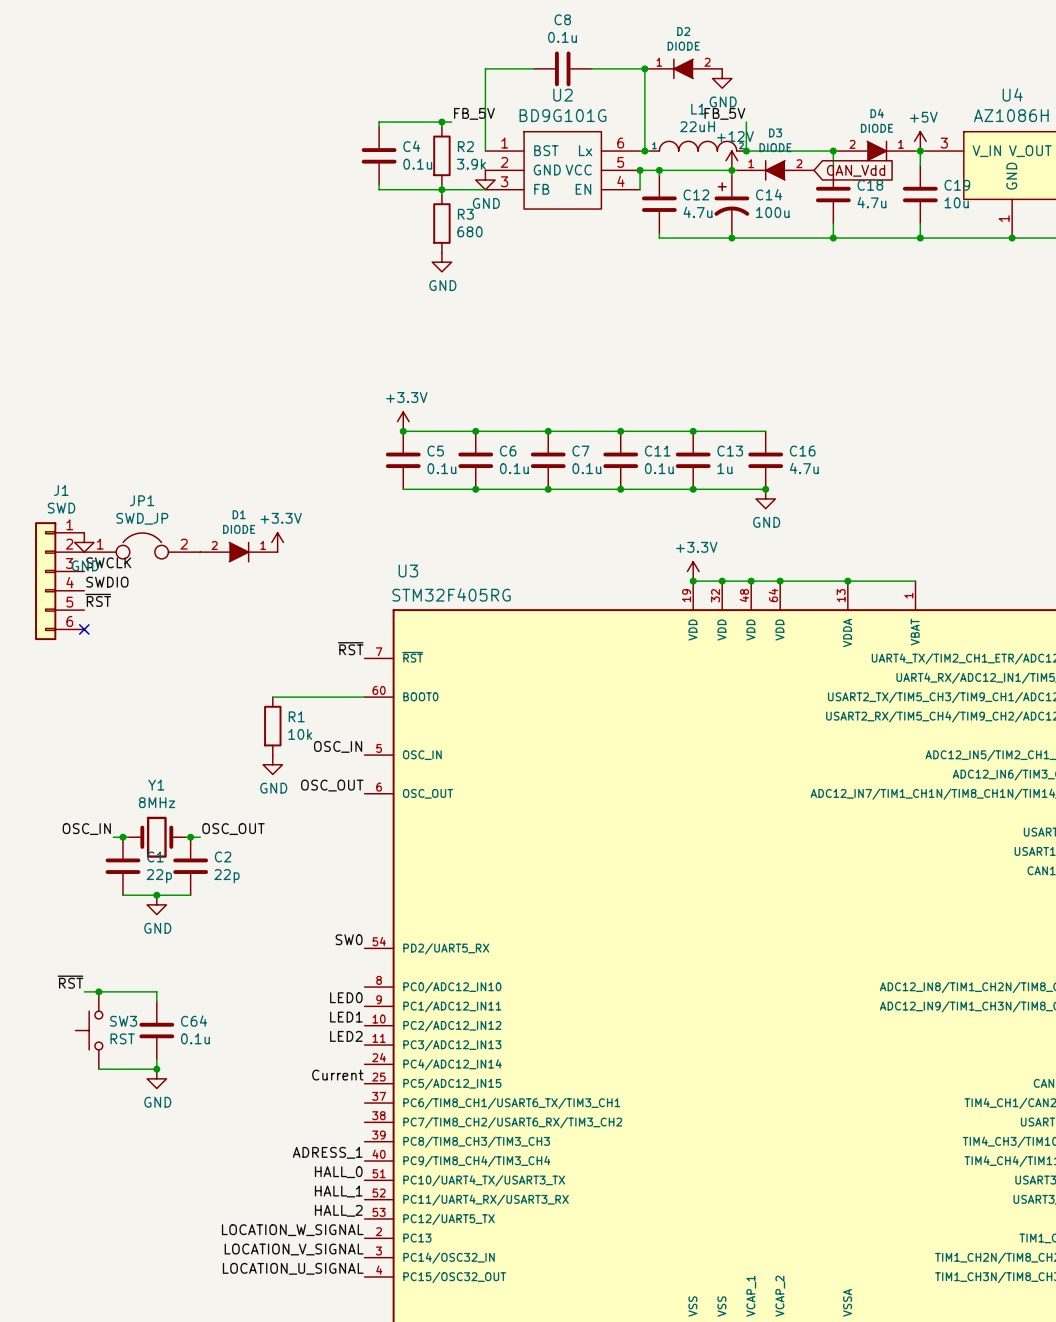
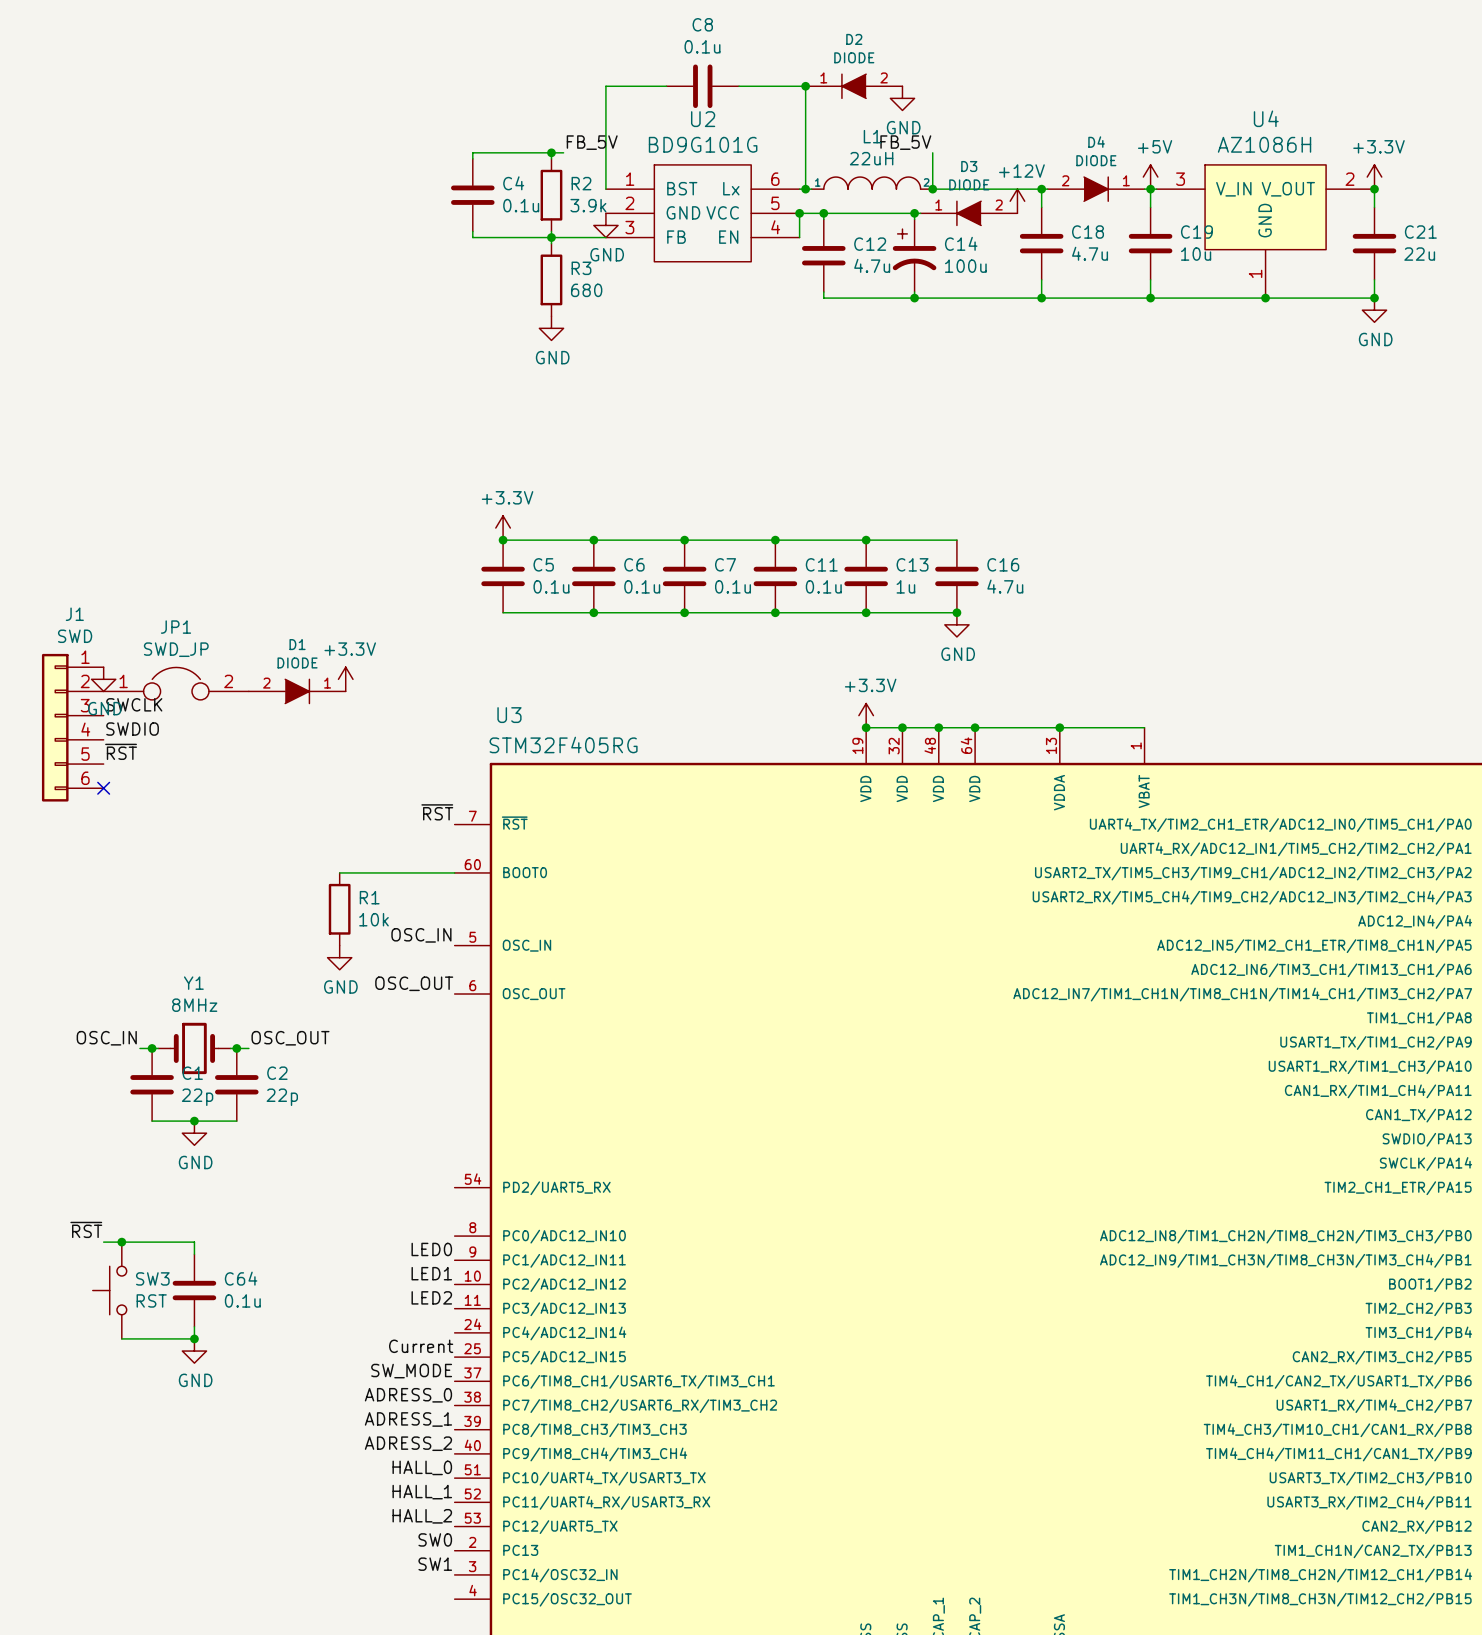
power symbol position: +12V (731, 160) -> +12V (1017, 201)
global label: CAN_Vdd (856, 170) -> none
label: SW0 (349, 939) -> none
label: none -> SW_MODE (411, 1371)
label: none -> ADRESS_0 (408, 1395)
label: none -> ADRESS_1 (408, 1419)
label: ADRESS_1 (327, 1152) -> ADRESS_2 (408, 1443)
label: LOCATION_W_SIGNAL (292, 1230) -> SW0 (435, 1539)
label: LOCATION_V_SIGNAL (294, 1249) -> SW1 (435, 1564)
label: LOCATION_U_SIGNAL (293, 1268) -> none

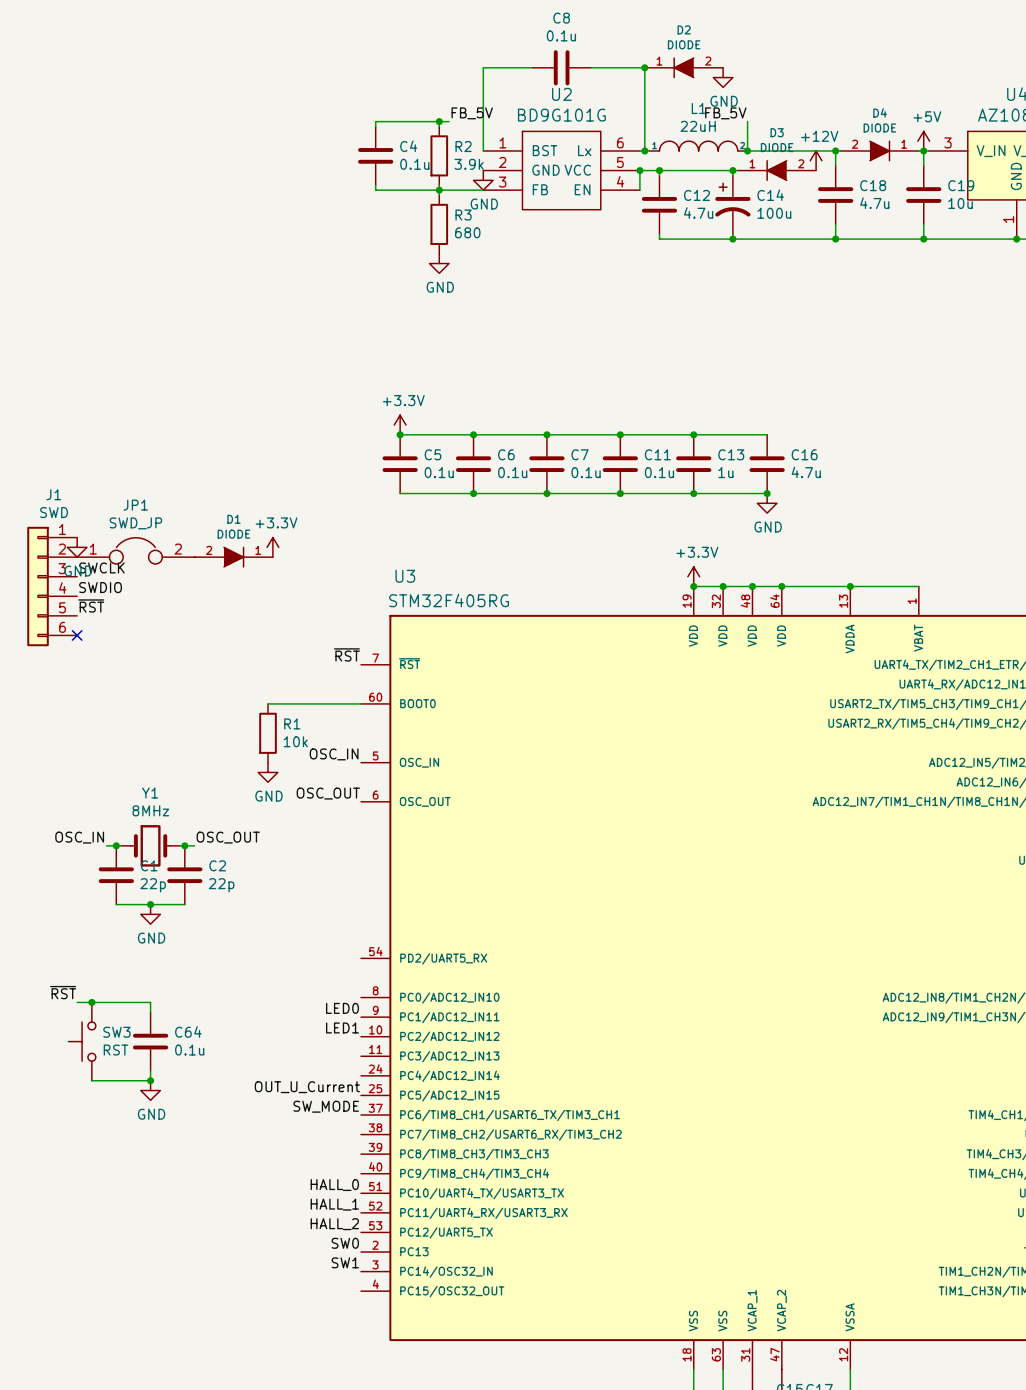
label: LED2 (431, 1297) -> none
label: Current (421, 1346) -> OUT_U_Current (307, 1087)
label: ADRESS_0 (408, 1395) -> none
label: ADRESS_1 (408, 1419) -> none
label: ADRESS_2 (408, 1443) -> none

